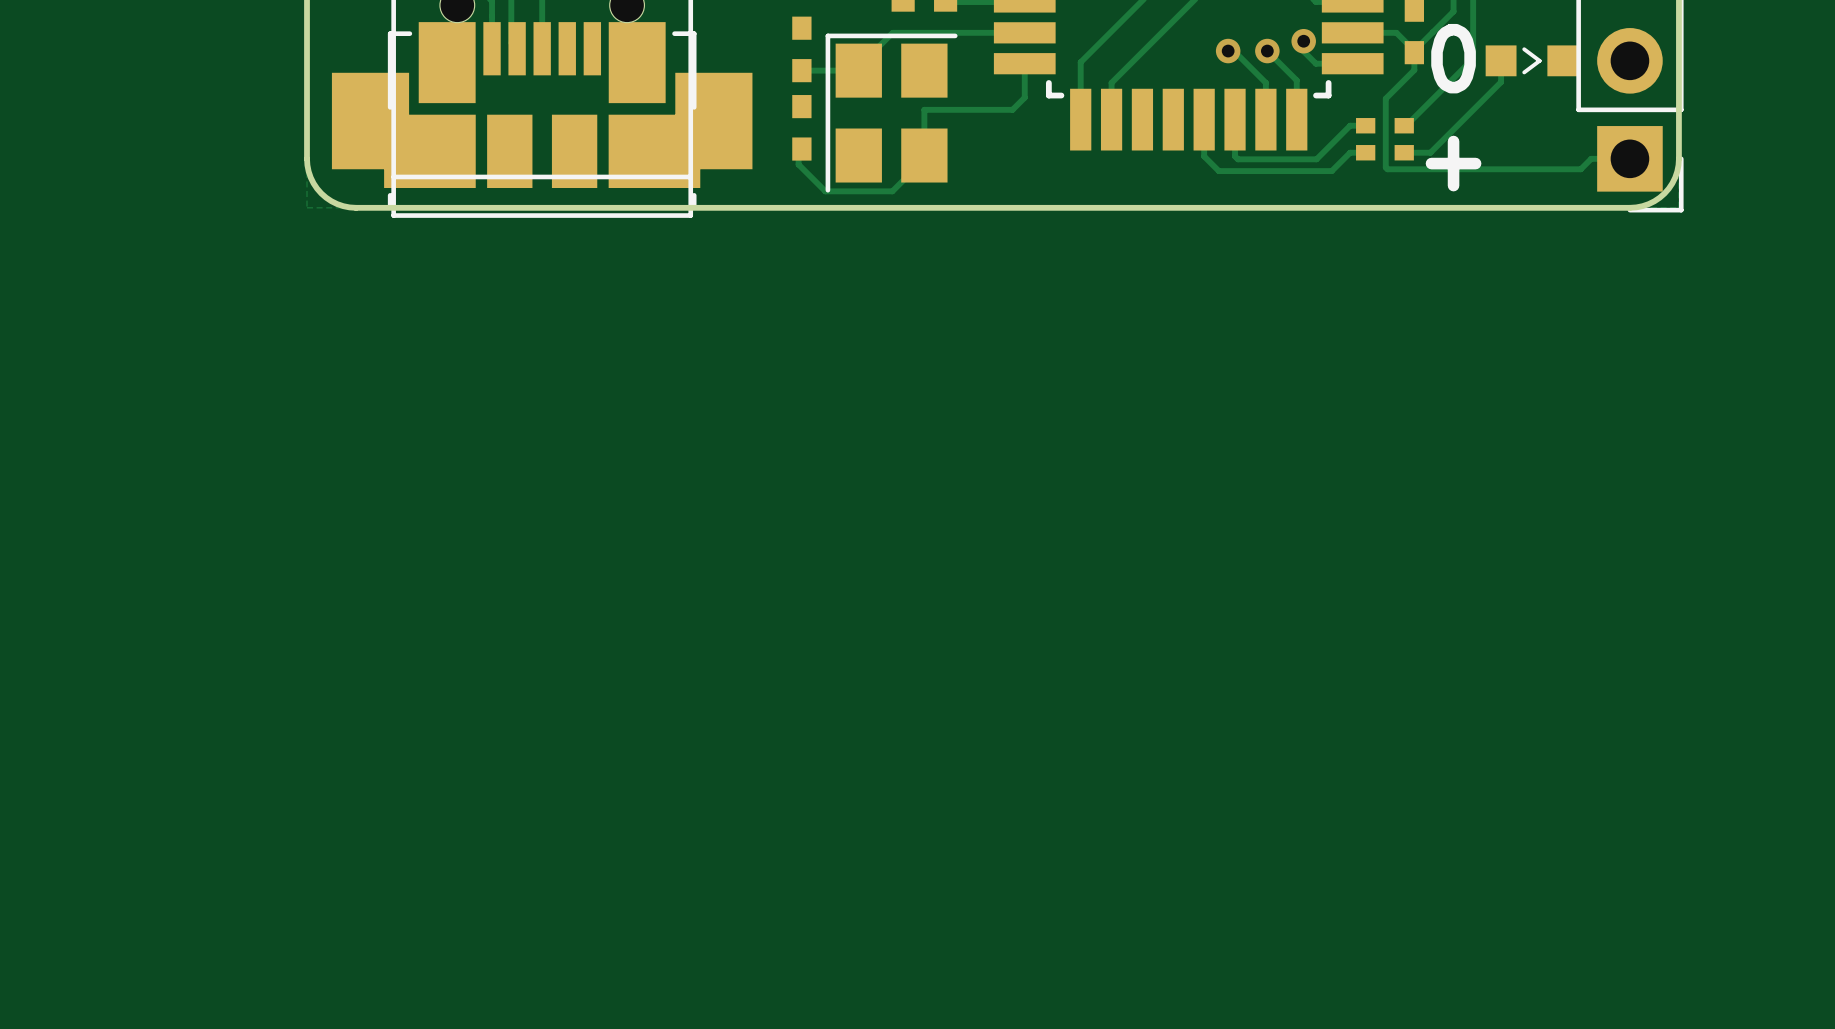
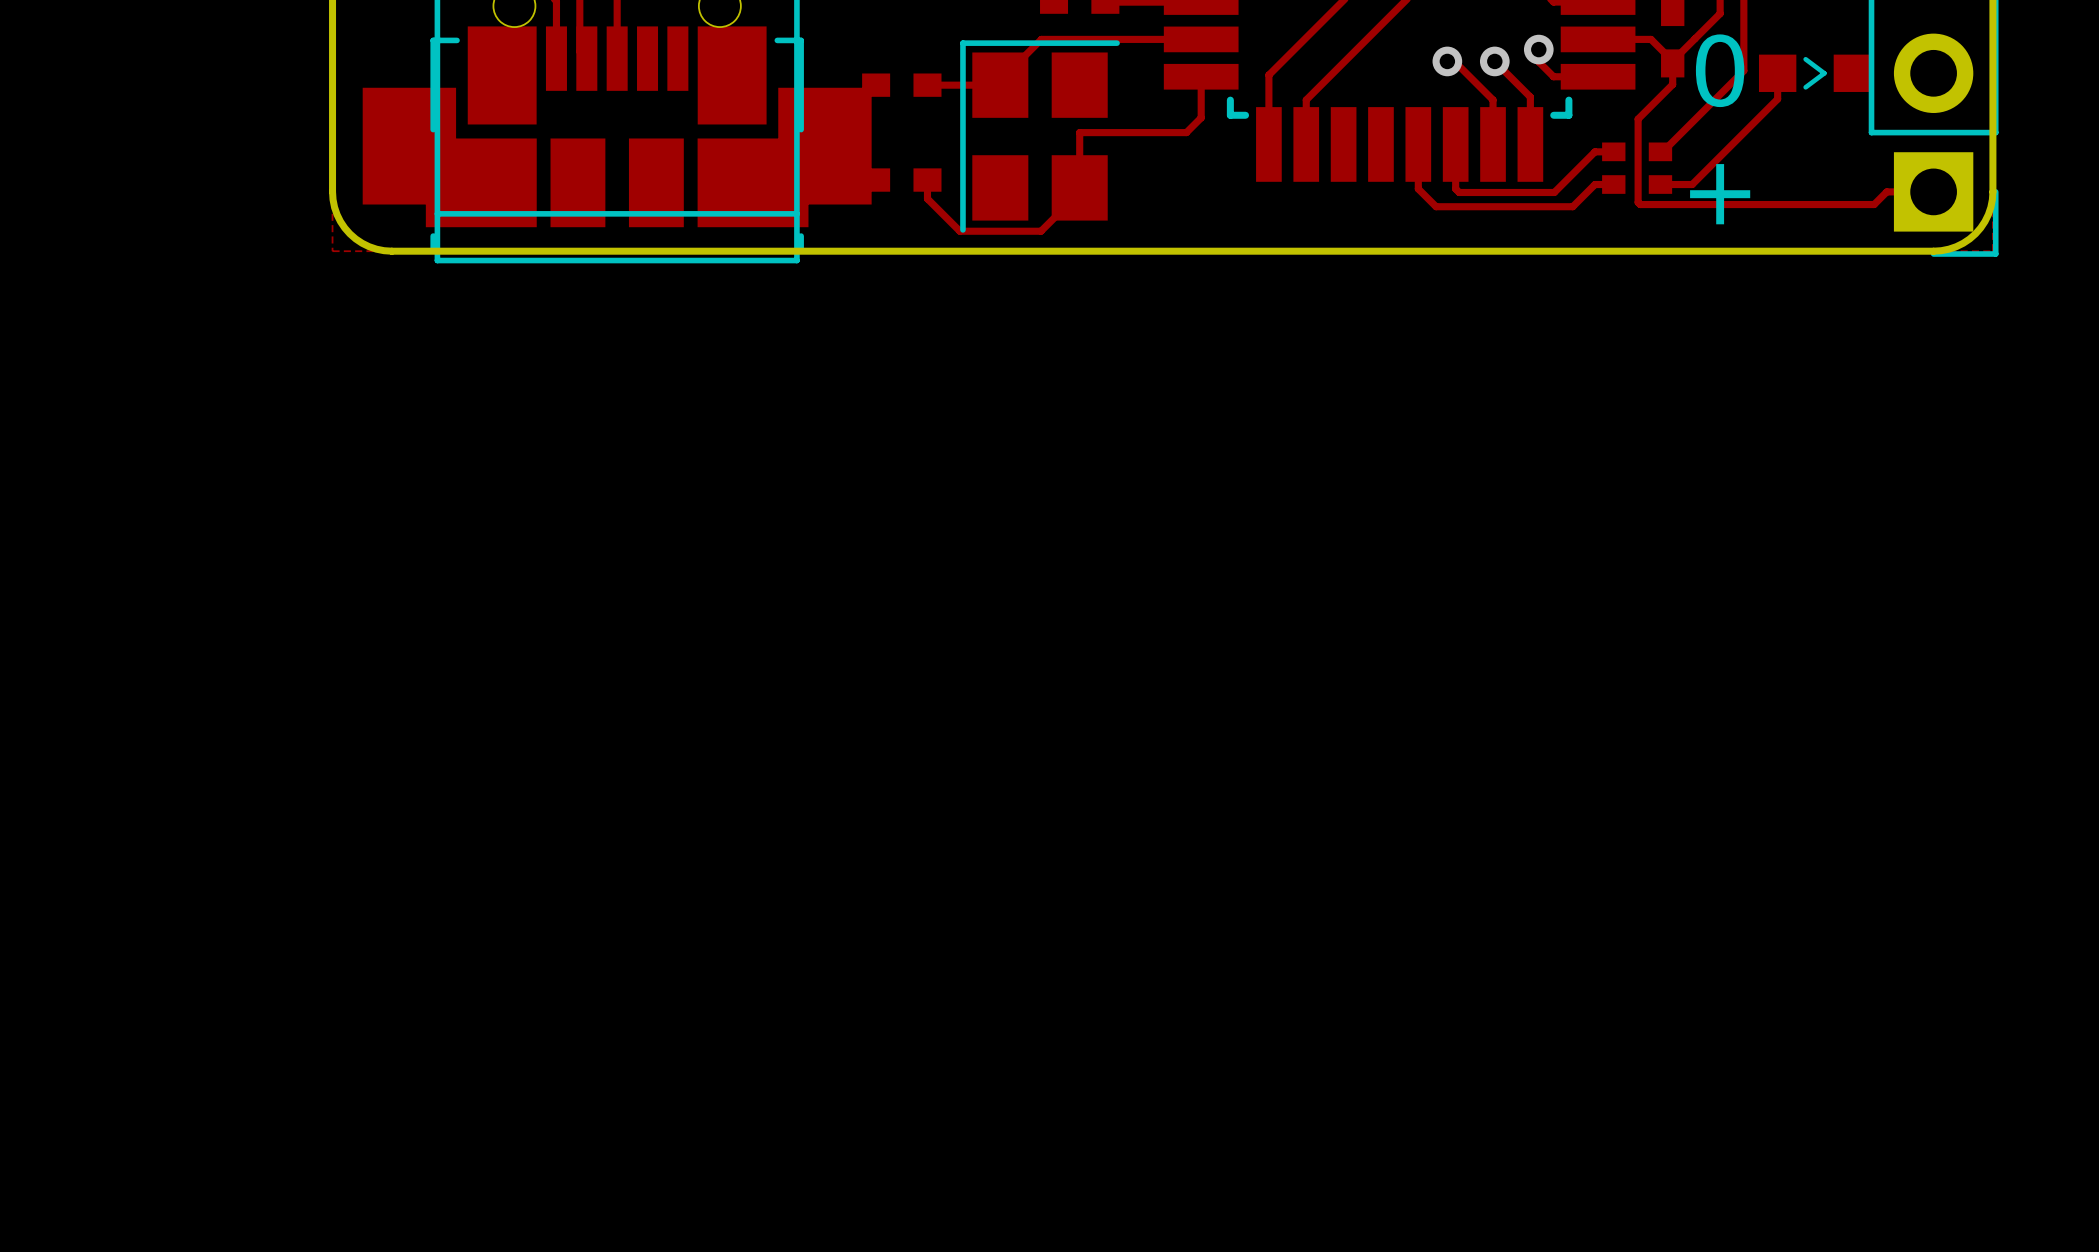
part: (801, 49) -> none
part: none -> (901, 85)
part: (801, 127) -> none
part: none -> (901, 180)

